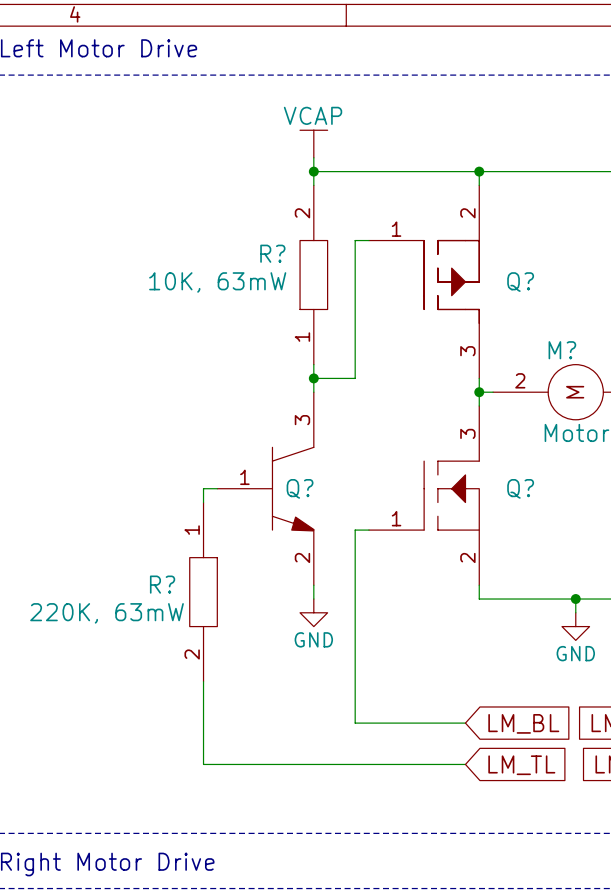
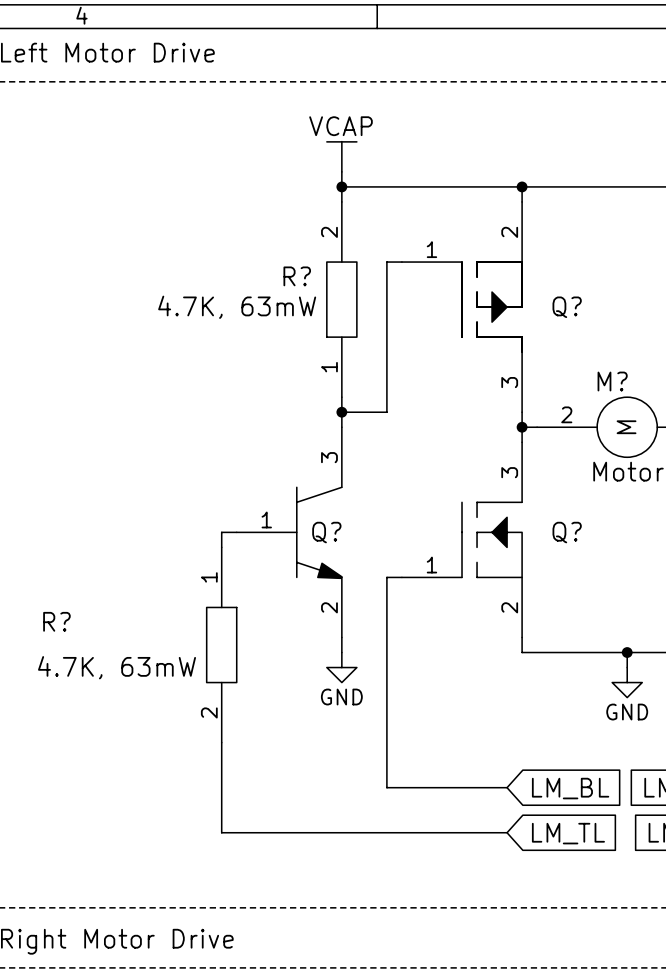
R? value: 10K, 63mW (217, 282) -> 4.7K, 63mW (237, 307)
R? name position: R? (162, 584) -> R? (56, 621)
R? value: 220K, 63mW (107, 613) -> 4.7K, 63mW (117, 667)

